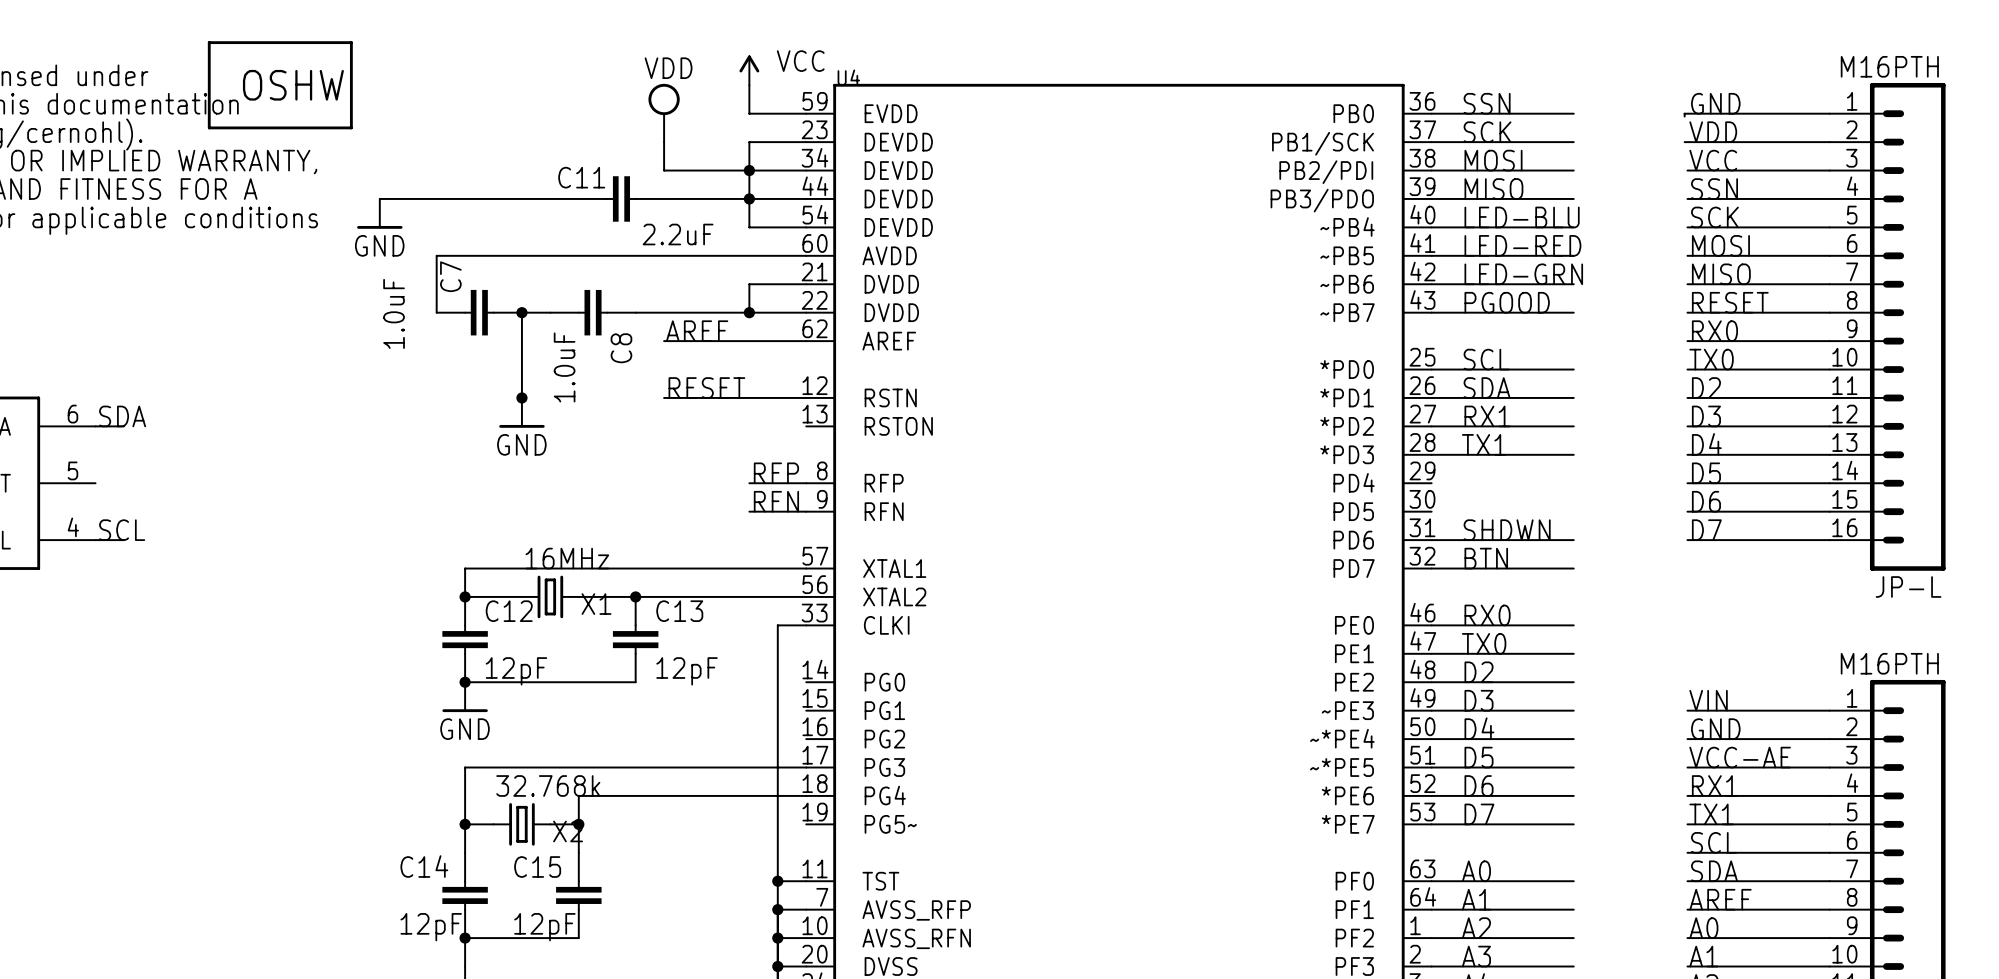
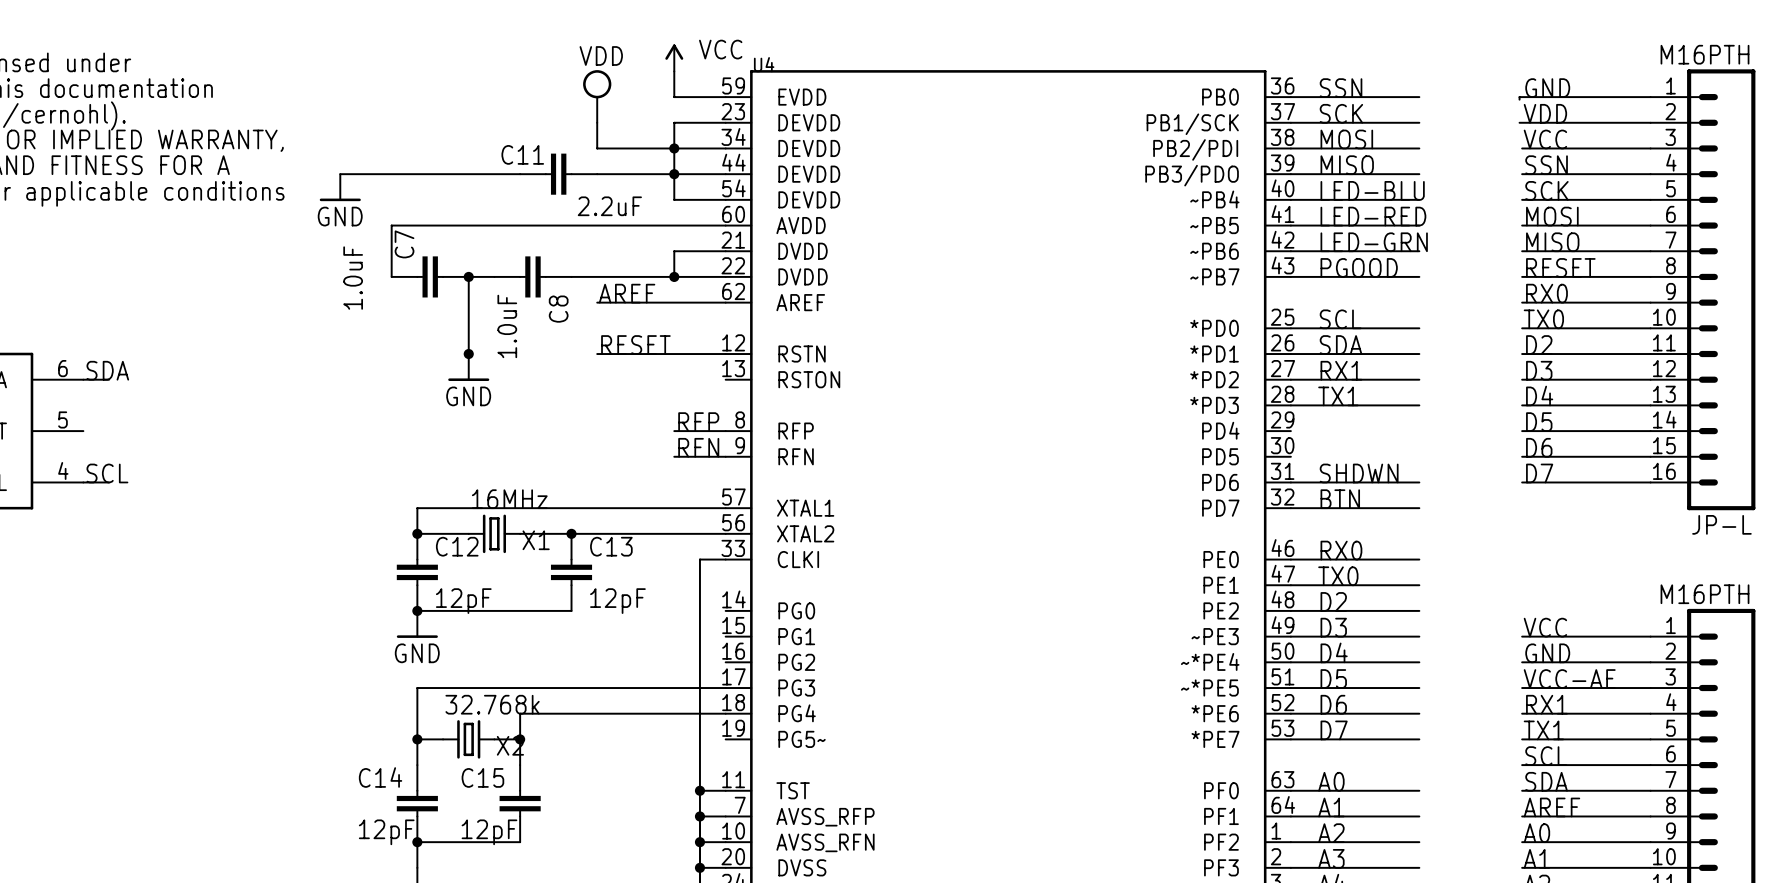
part: (280, 85) -> none
label: VIN (1708, 700) -> VCC (1545, 627)

